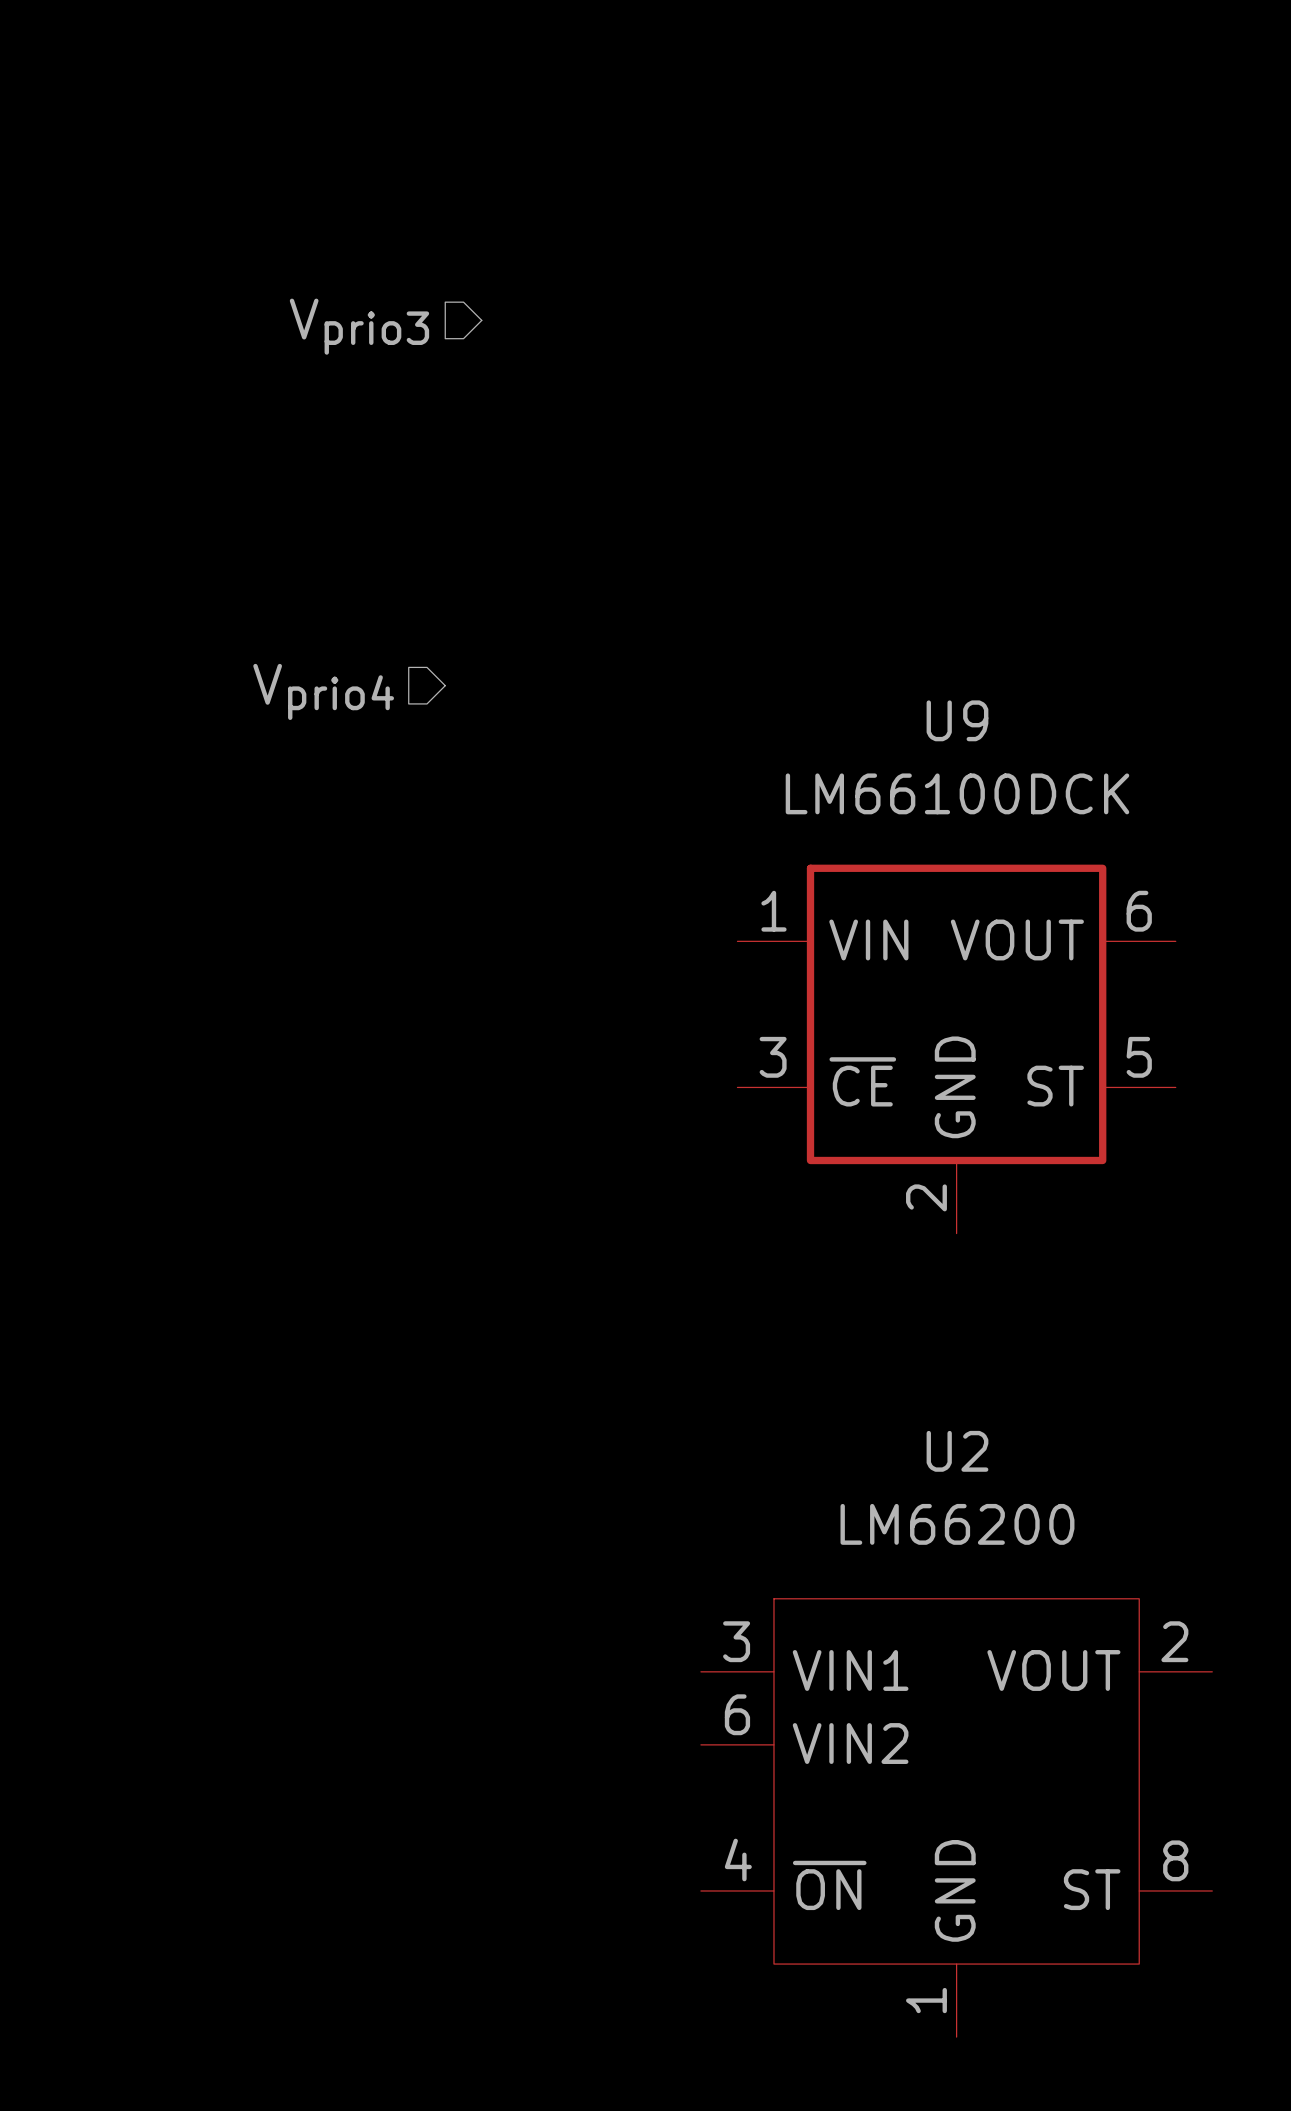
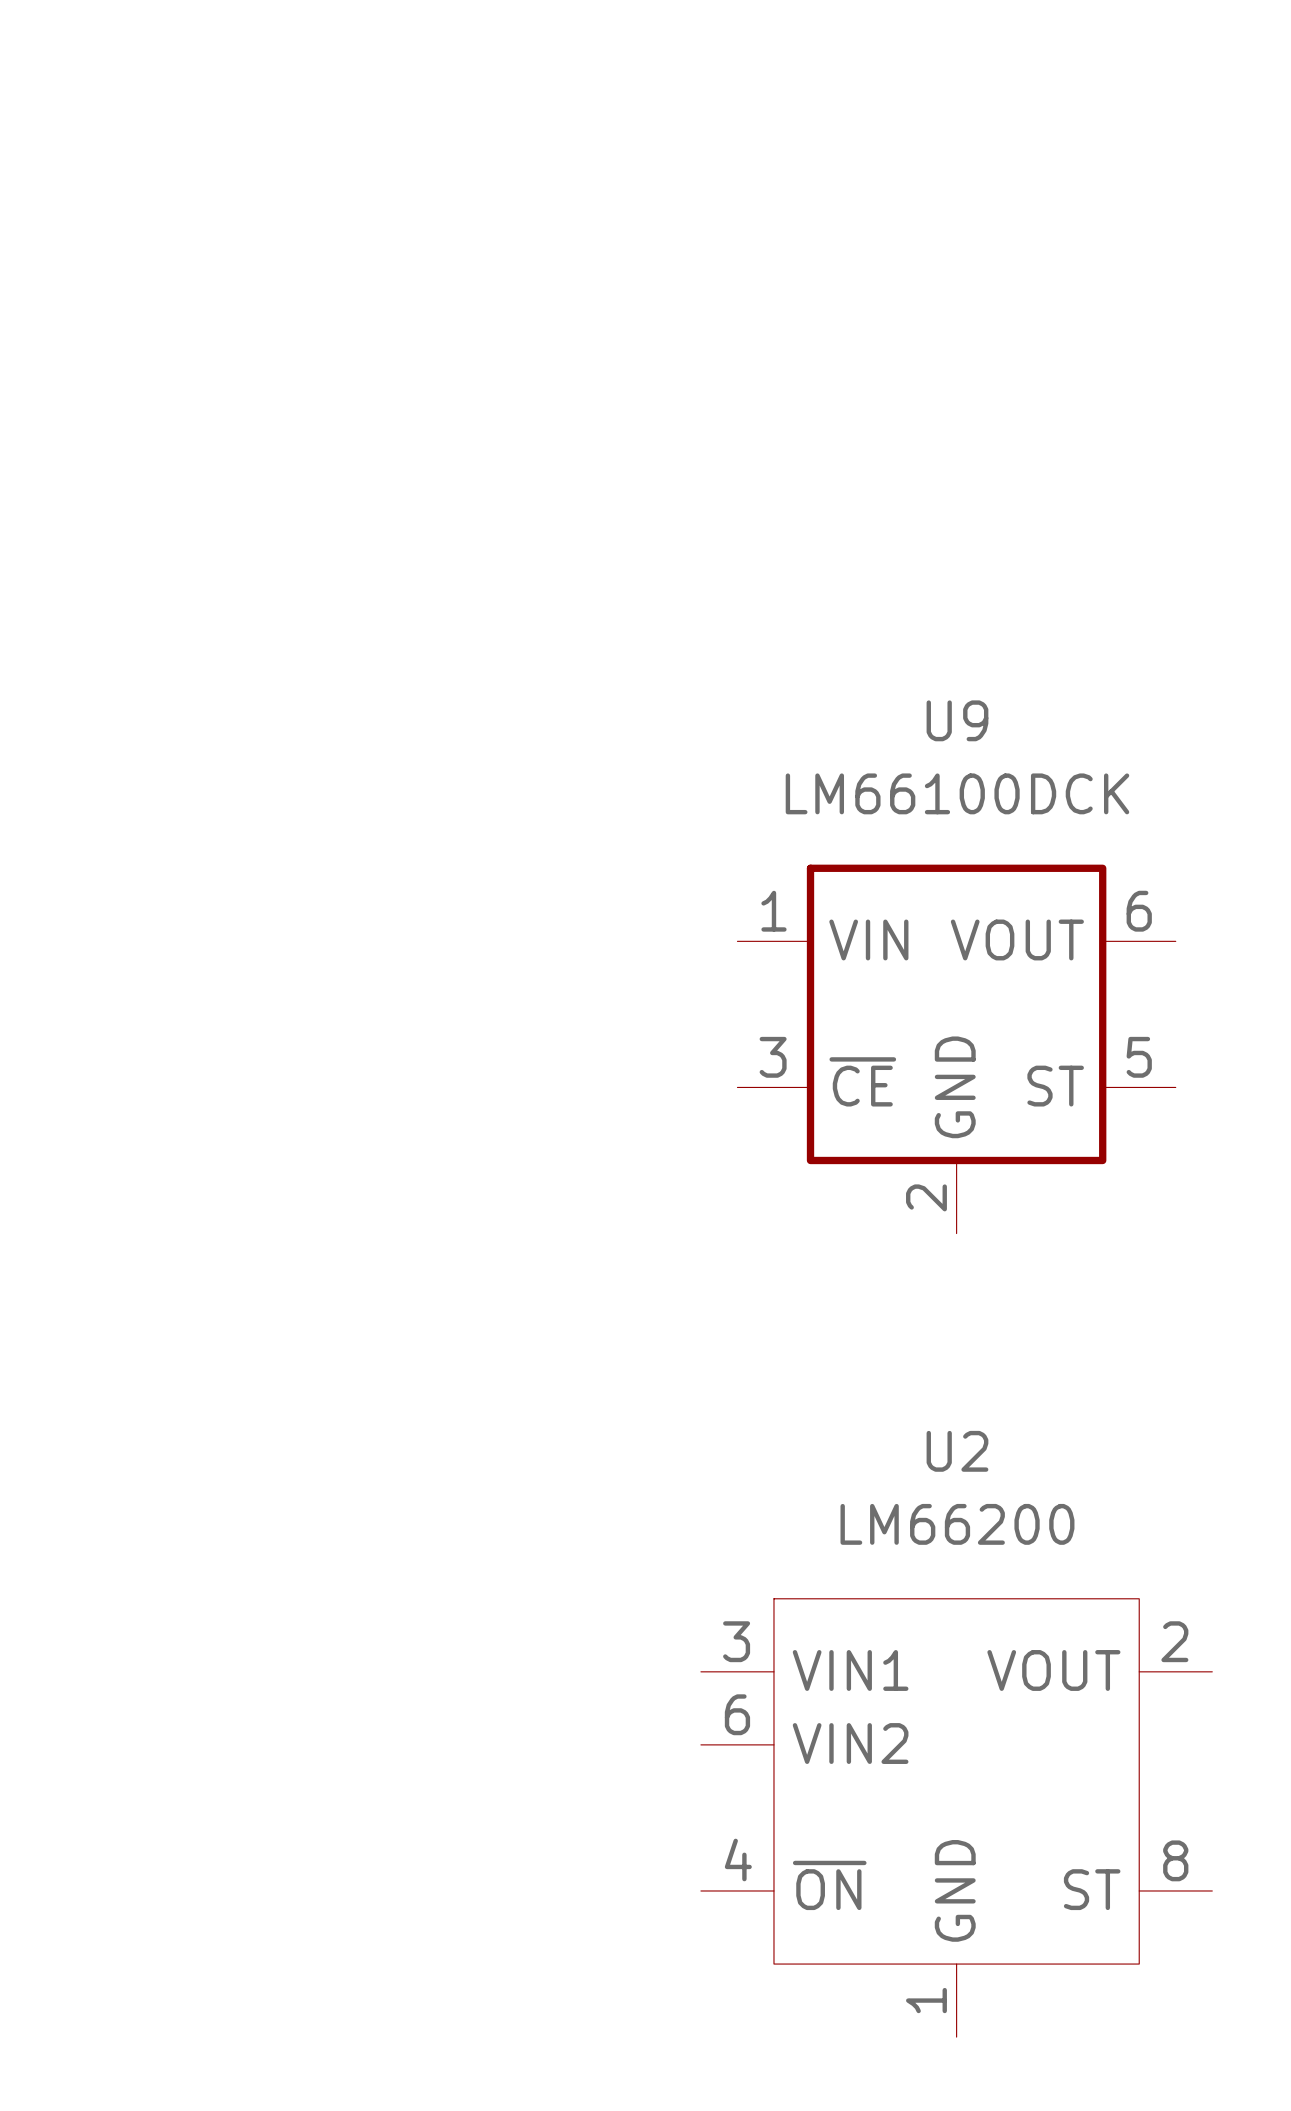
hierarchical label: Vprio3 (359, 326) -> none
hierarchical label: Vprio4 (323, 691) -> none

